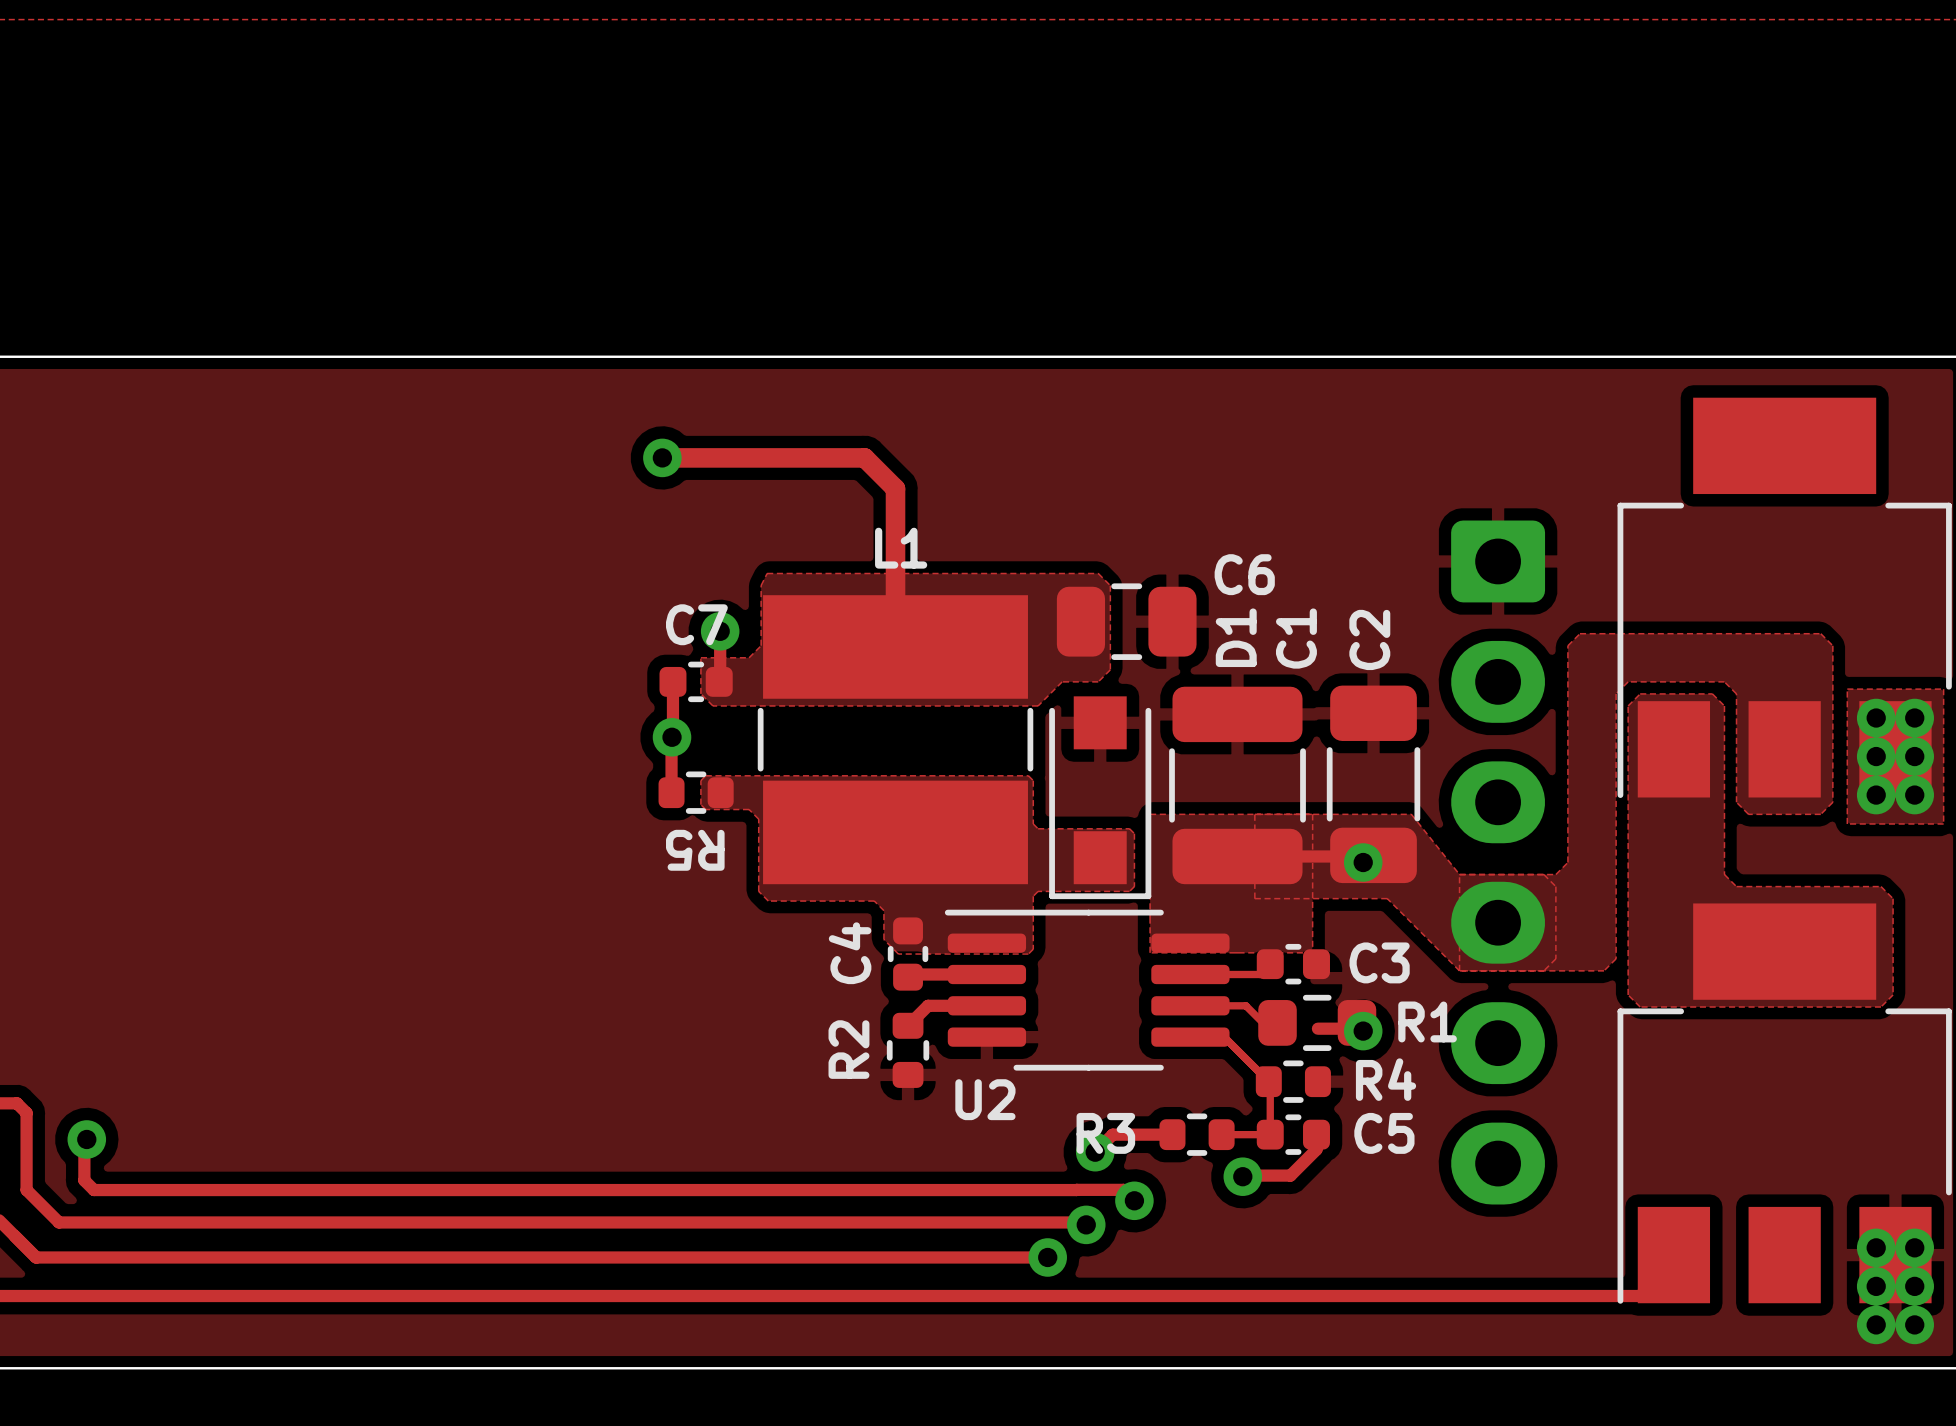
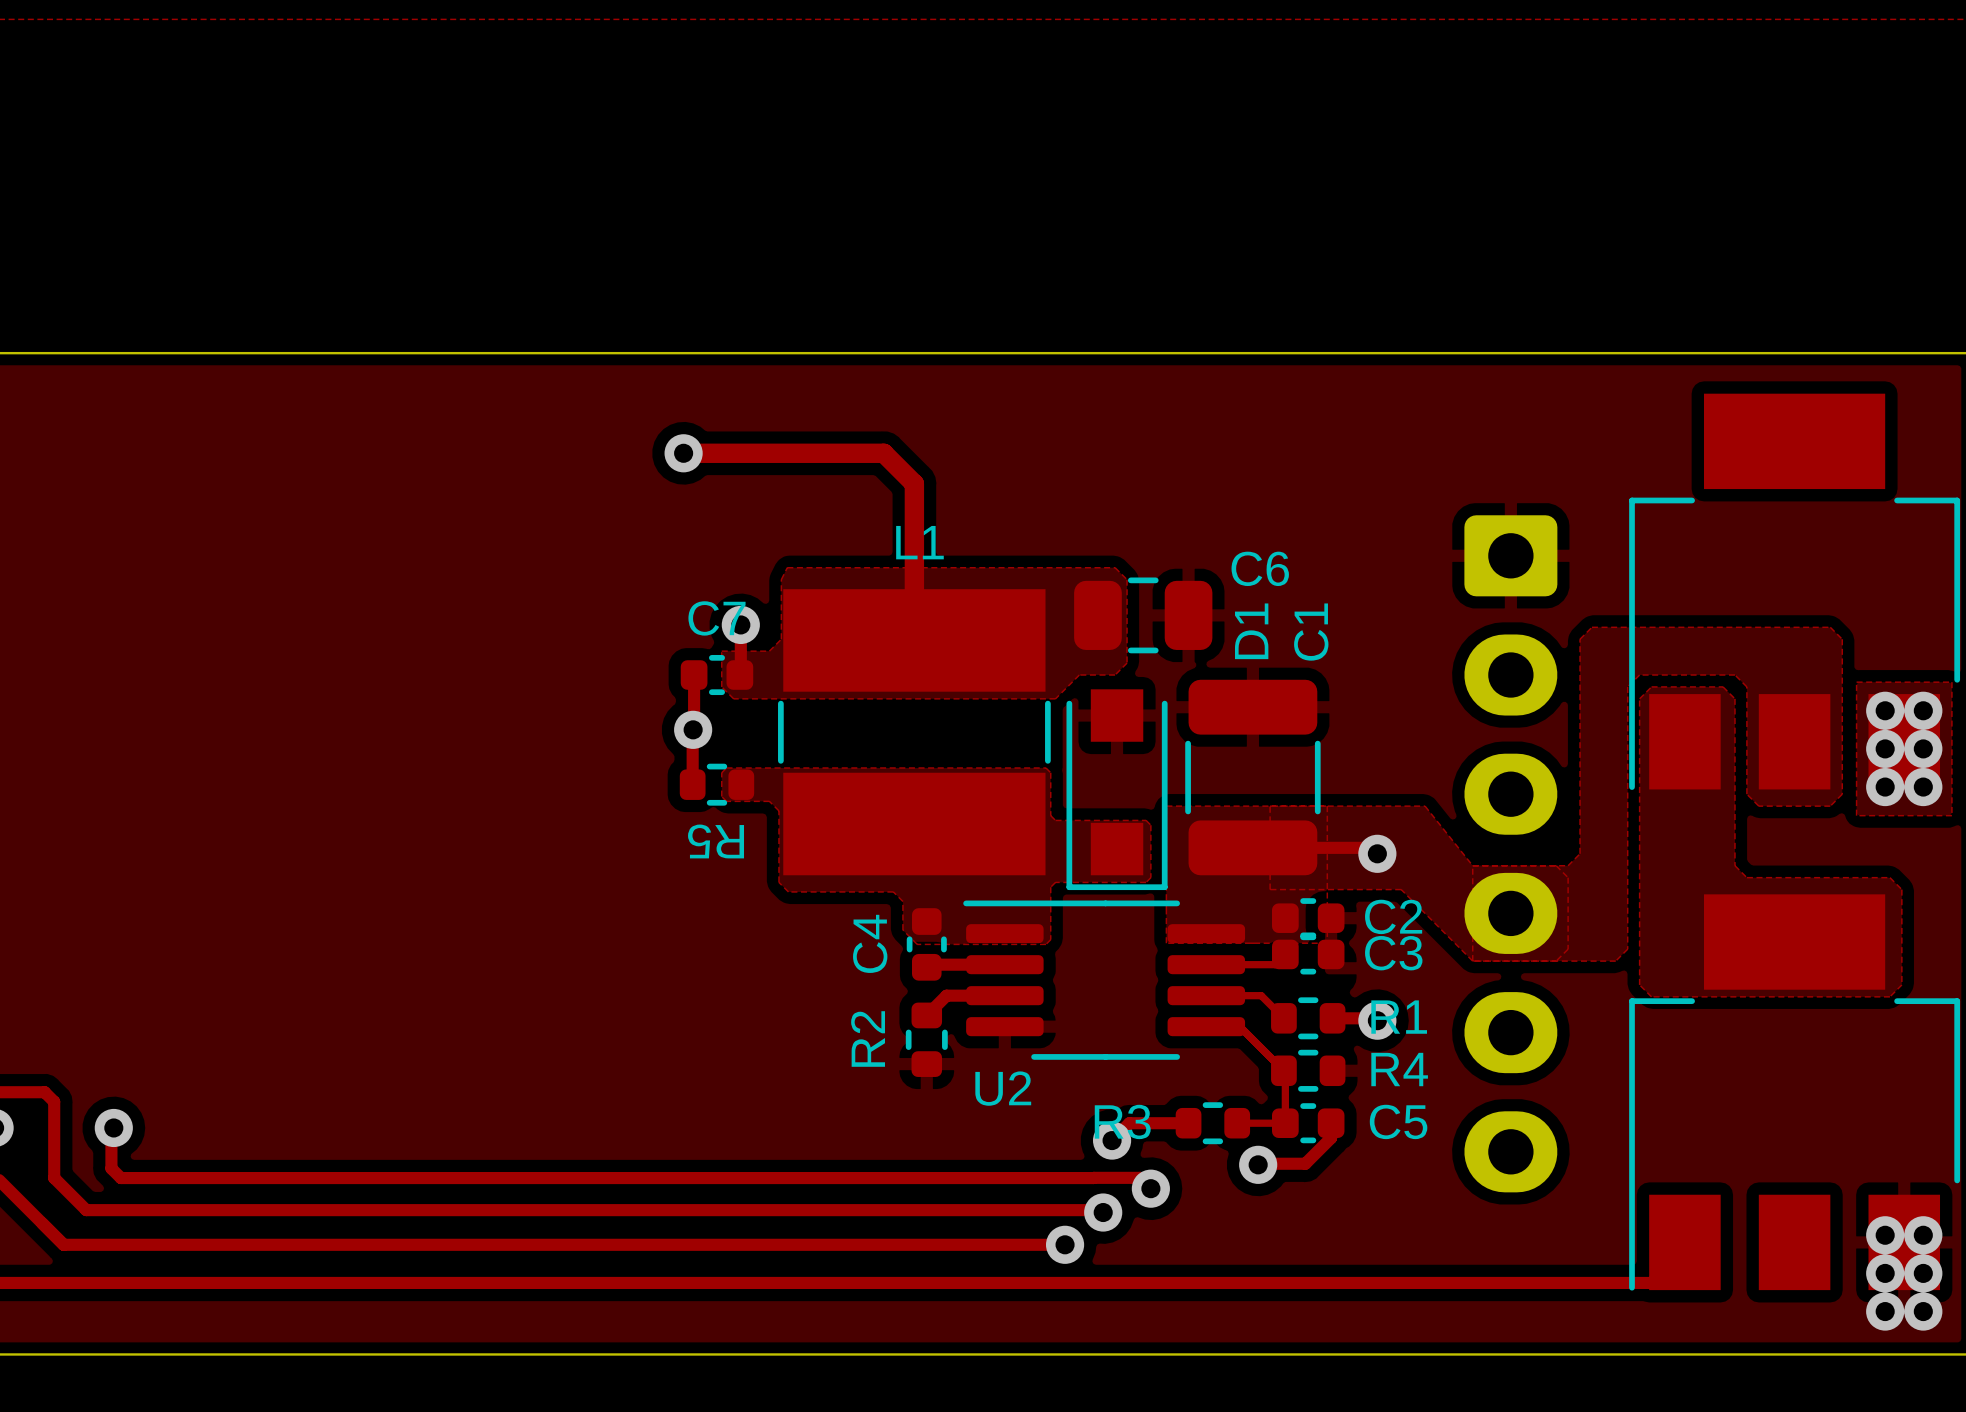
C2 name position: C2 (1369, 639) -> C2 (1393, 916)
C2 footprint: [1326, 685, 1421, 884] -> [1272, 898, 1345, 939]
R1 footprint: [1258, 994, 1377, 1051] -> [1271, 997, 1346, 1040]
R1 name position: R1 (1427, 1021) -> R1 (1399, 1017)

